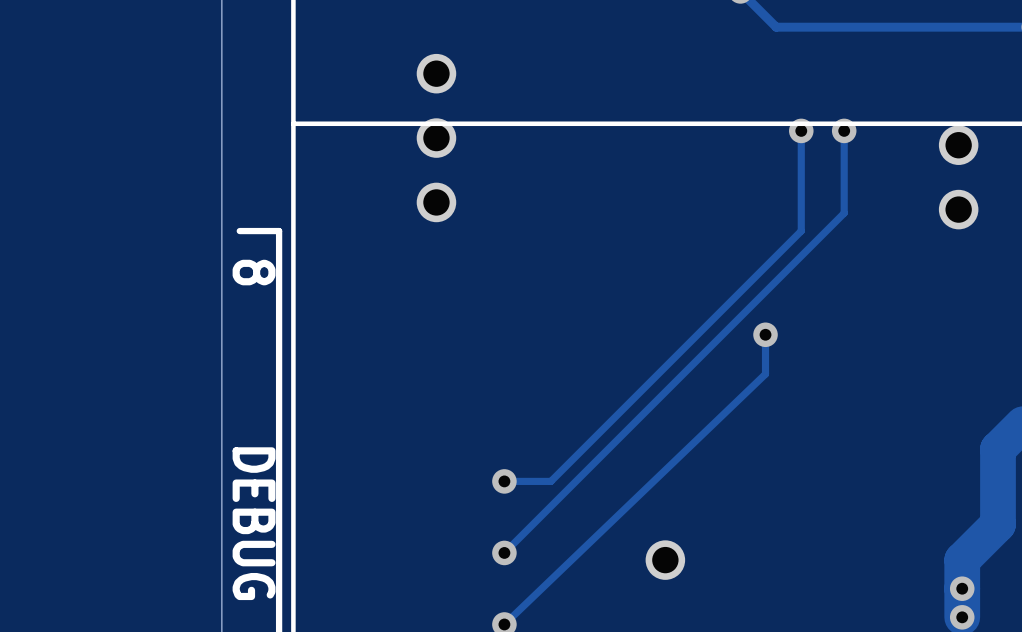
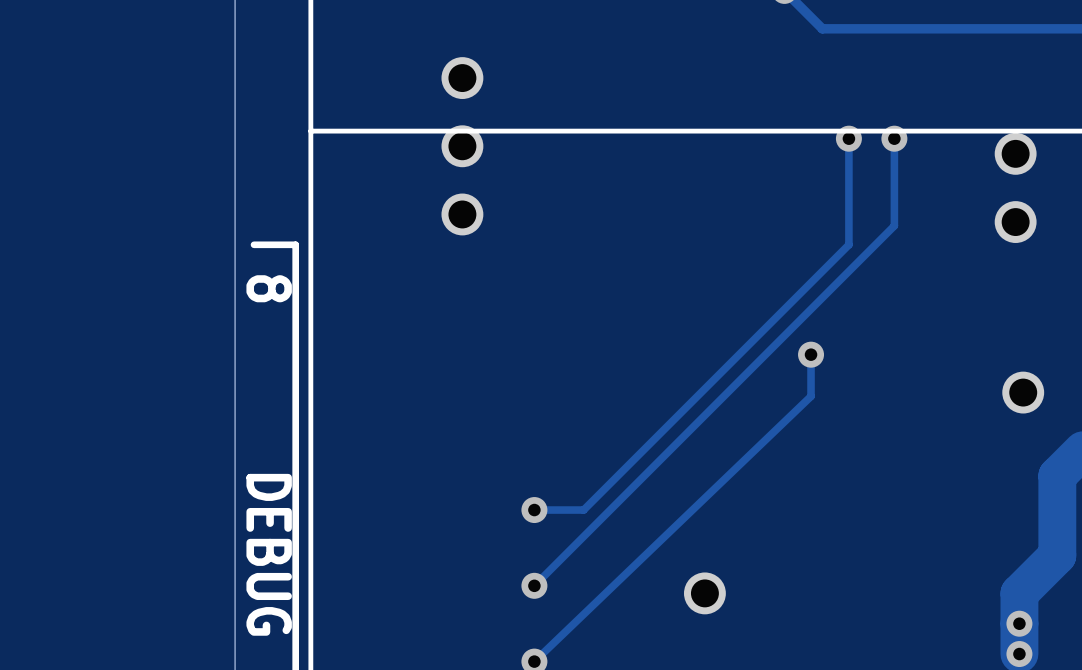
part: none -> (1023, 392)

